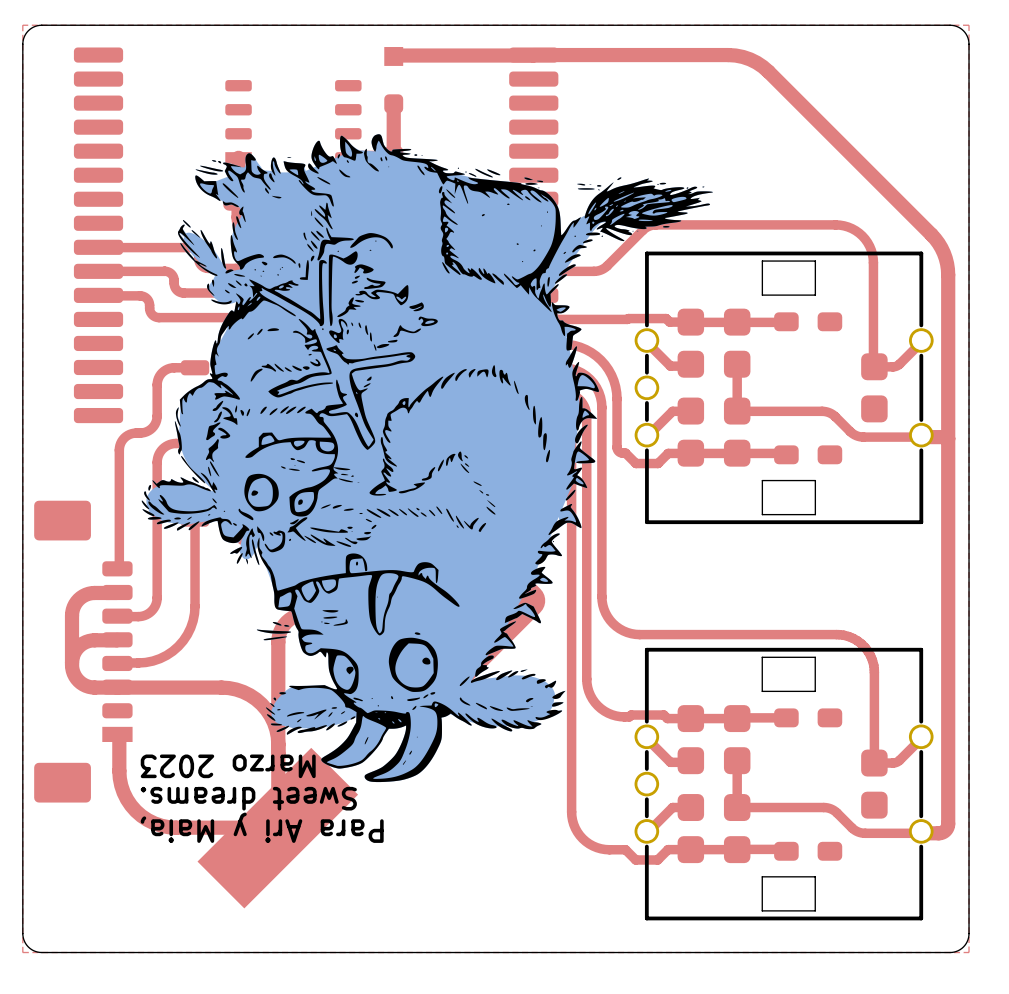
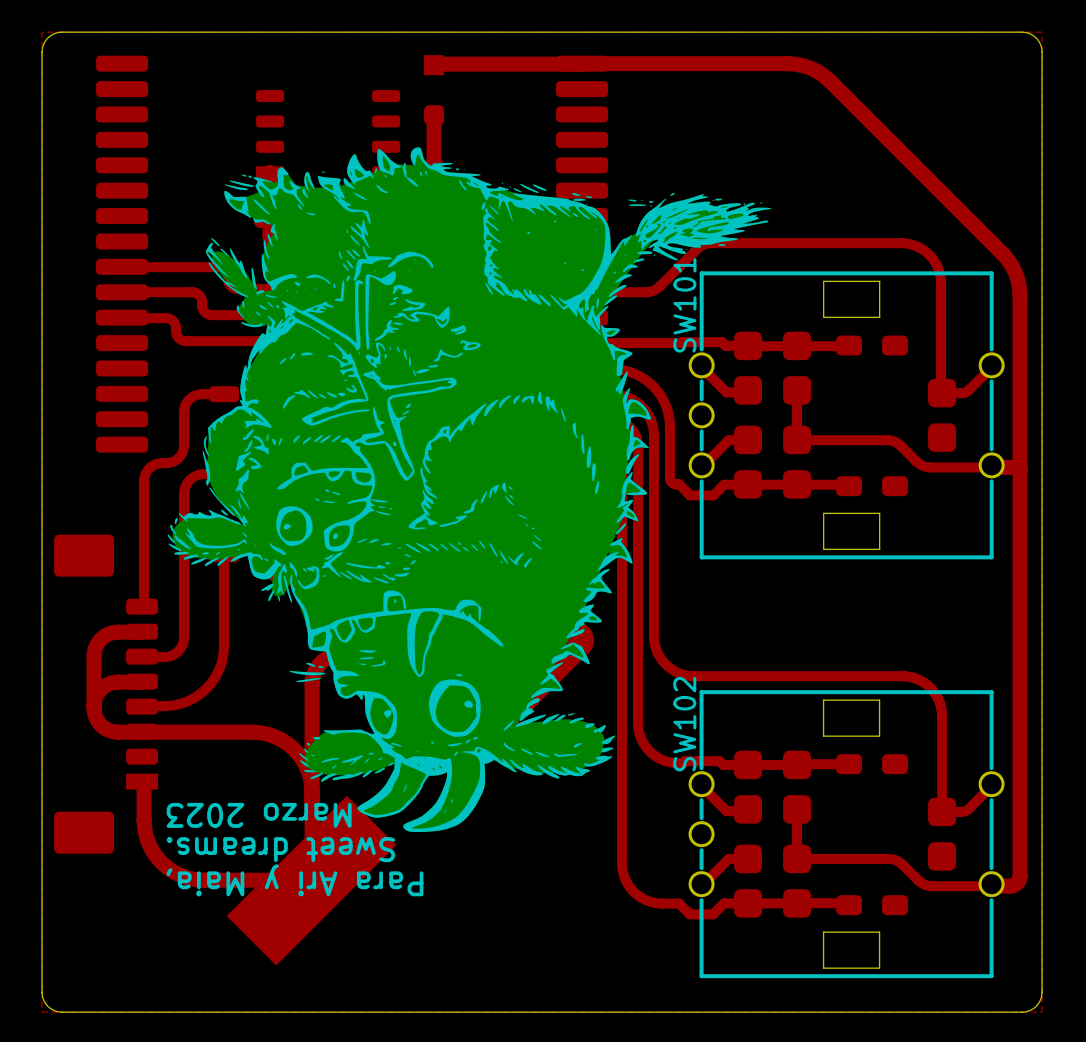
SW101 name: none -> SW101 (684, 305)
SW102 name: none -> SW102 (684, 724)

